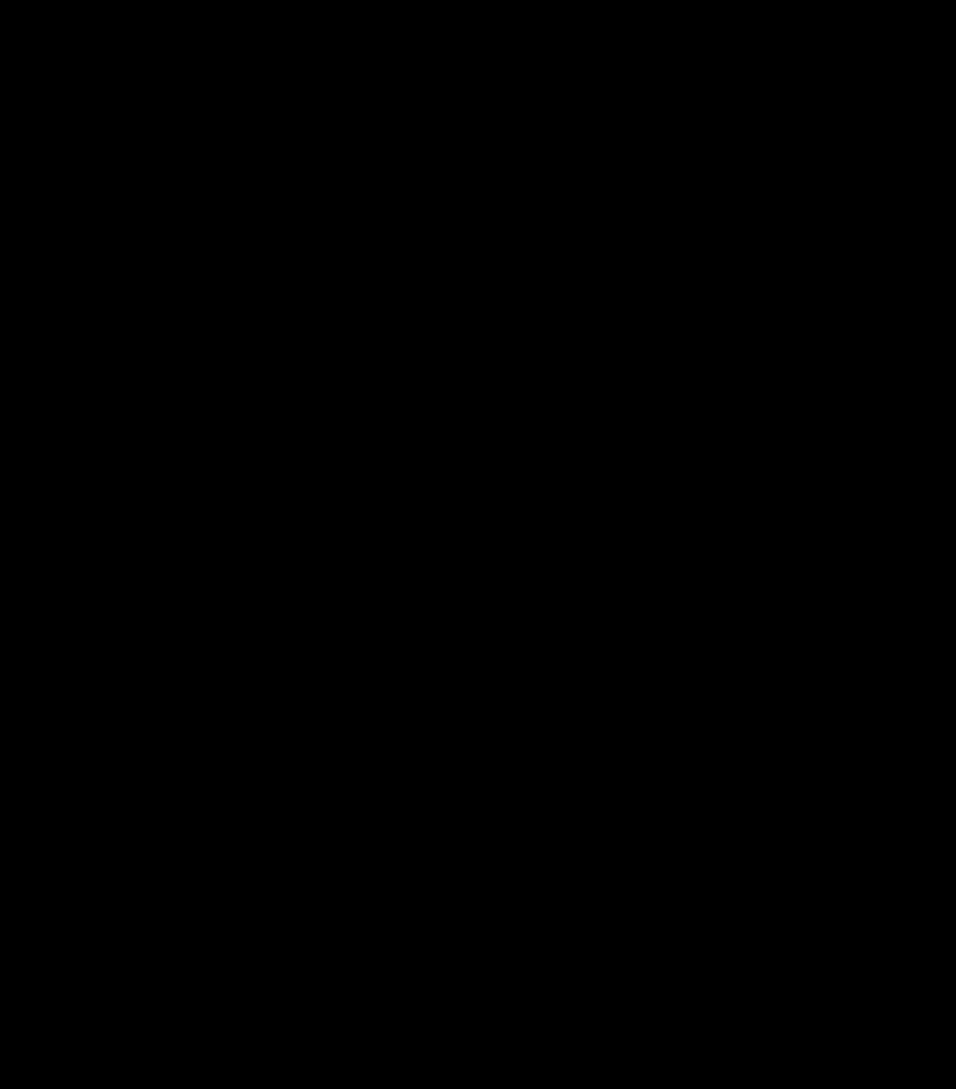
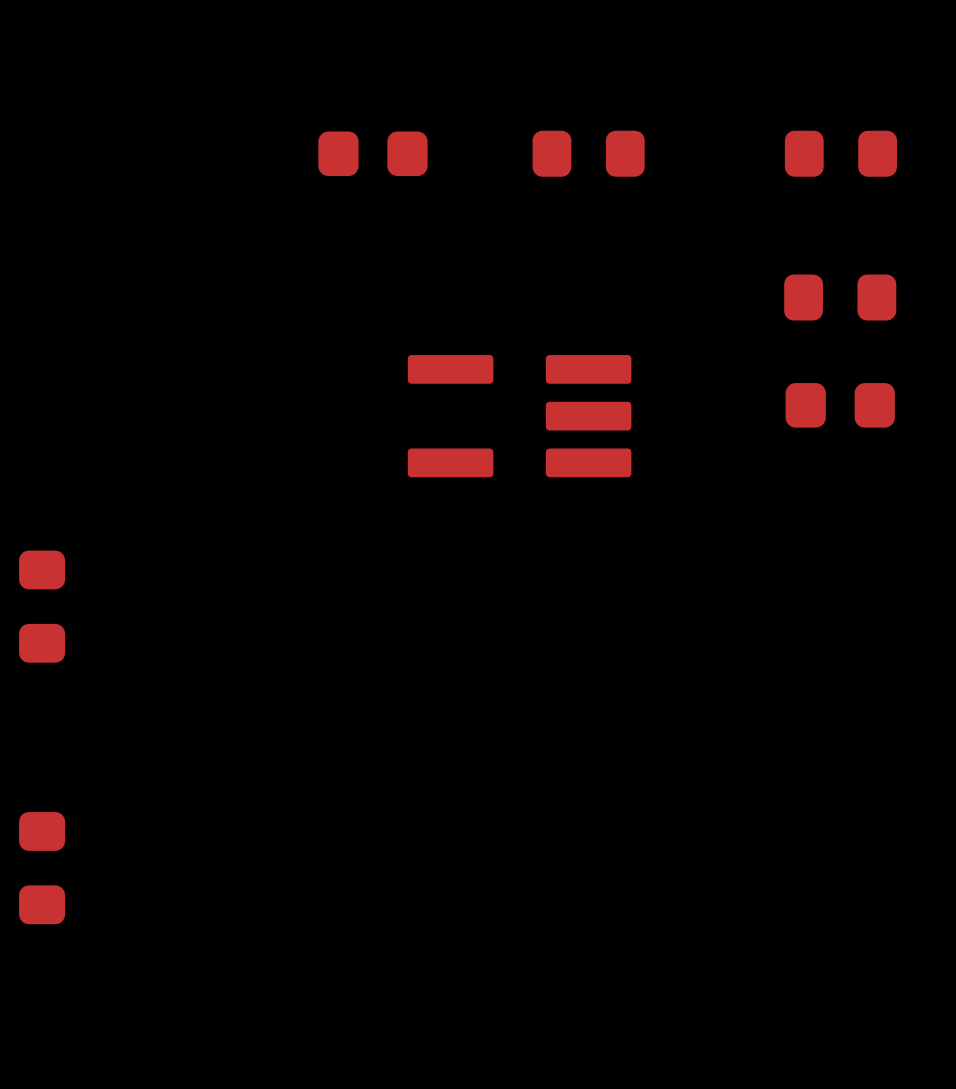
part: none -> (372, 153)
part: none -> (588, 153)
part: none -> (840, 153)
part: none -> (840, 297)
part: none -> (840, 405)
part: none -> (519, 416)
part: none -> (42, 606)
part: none -> (42, 868)

